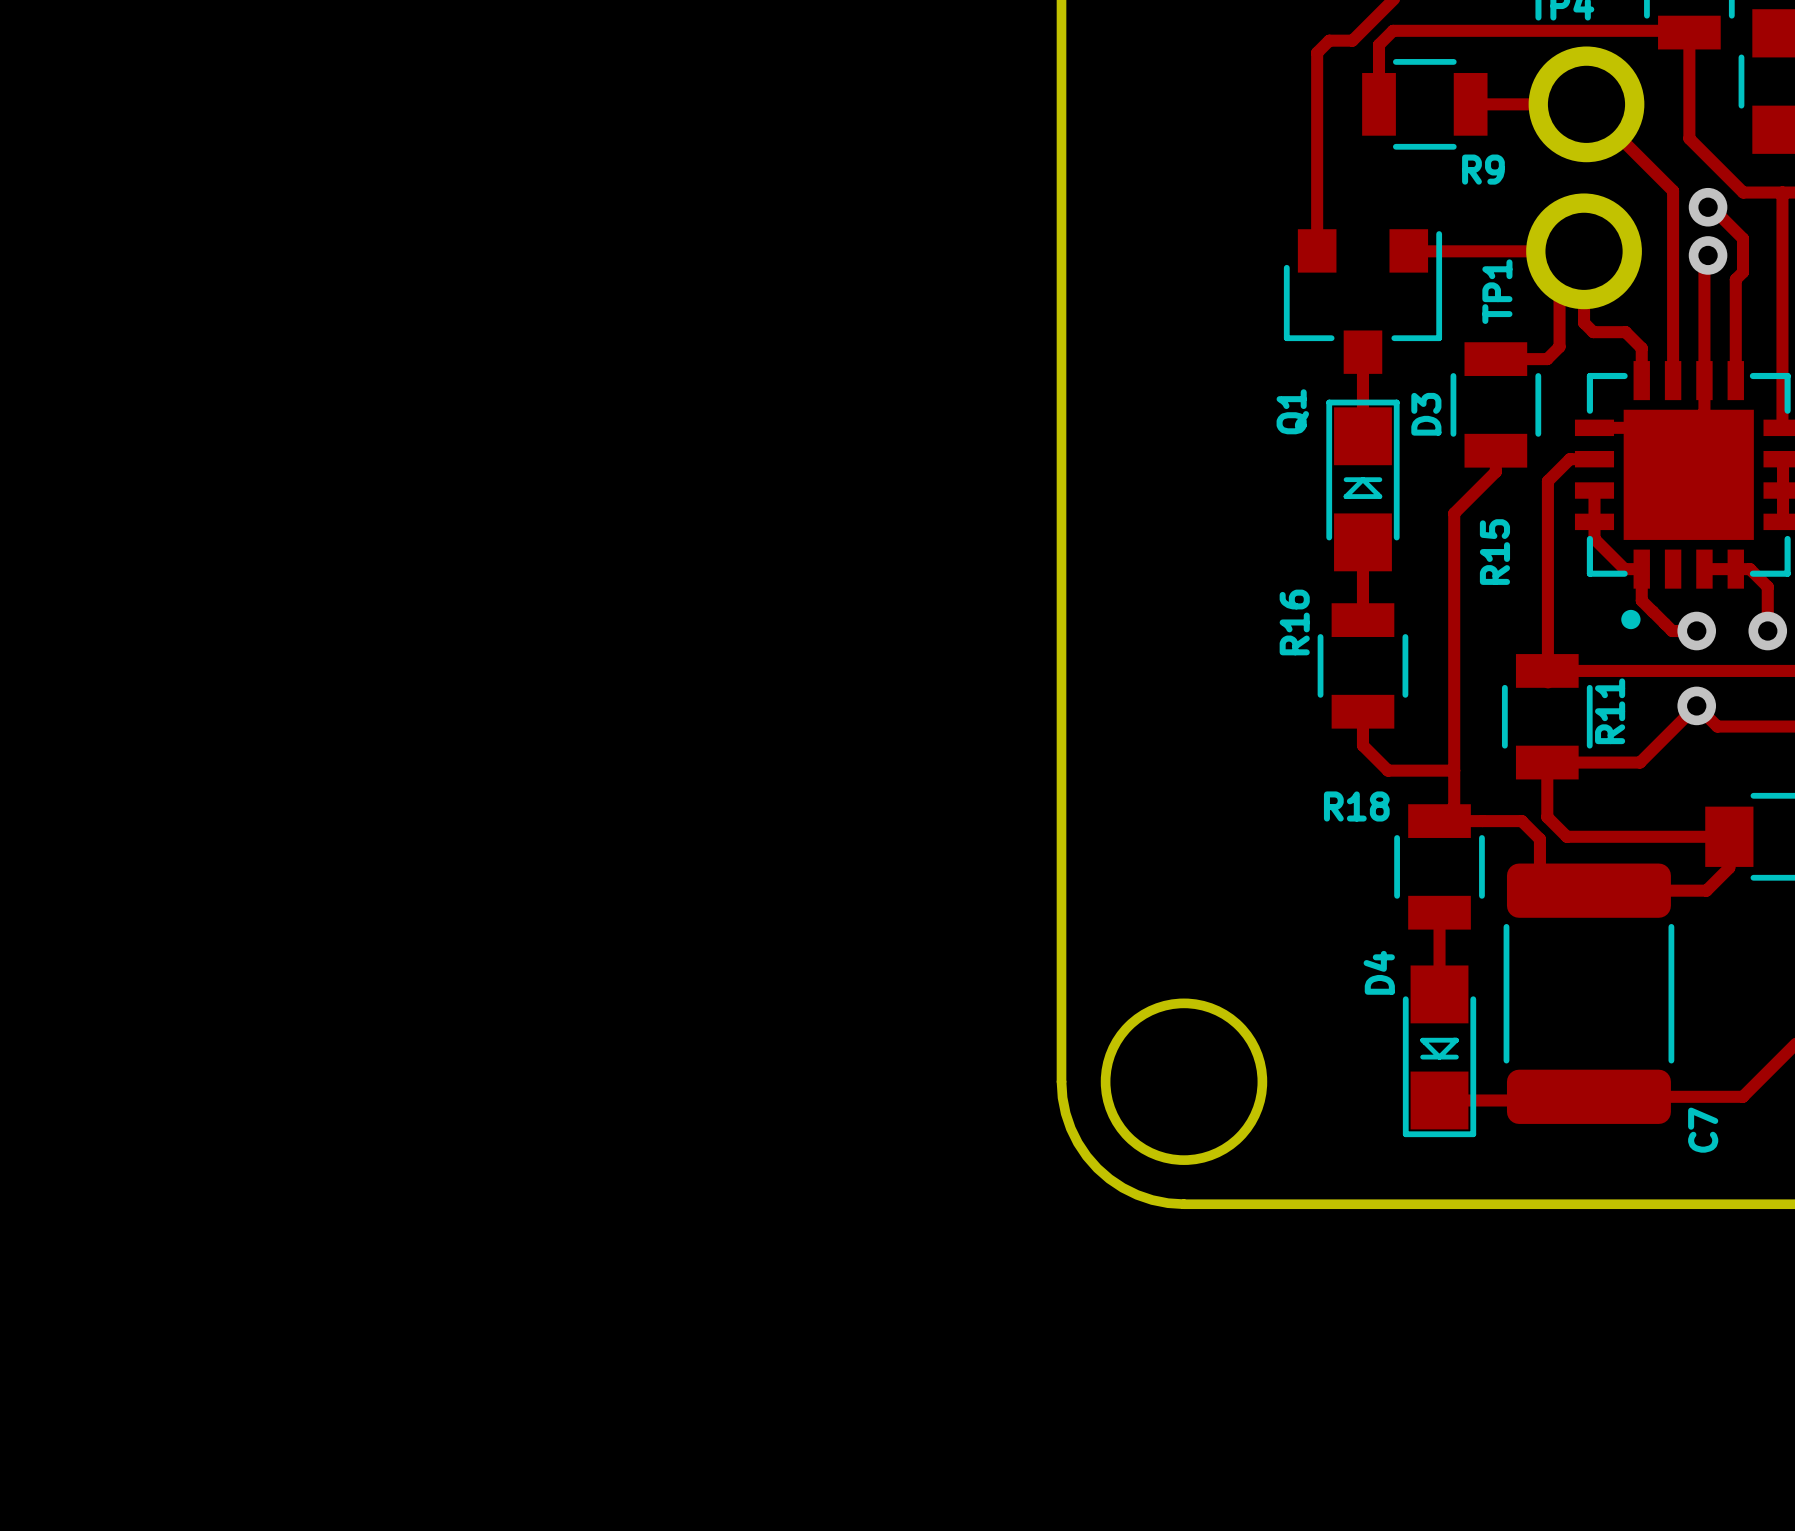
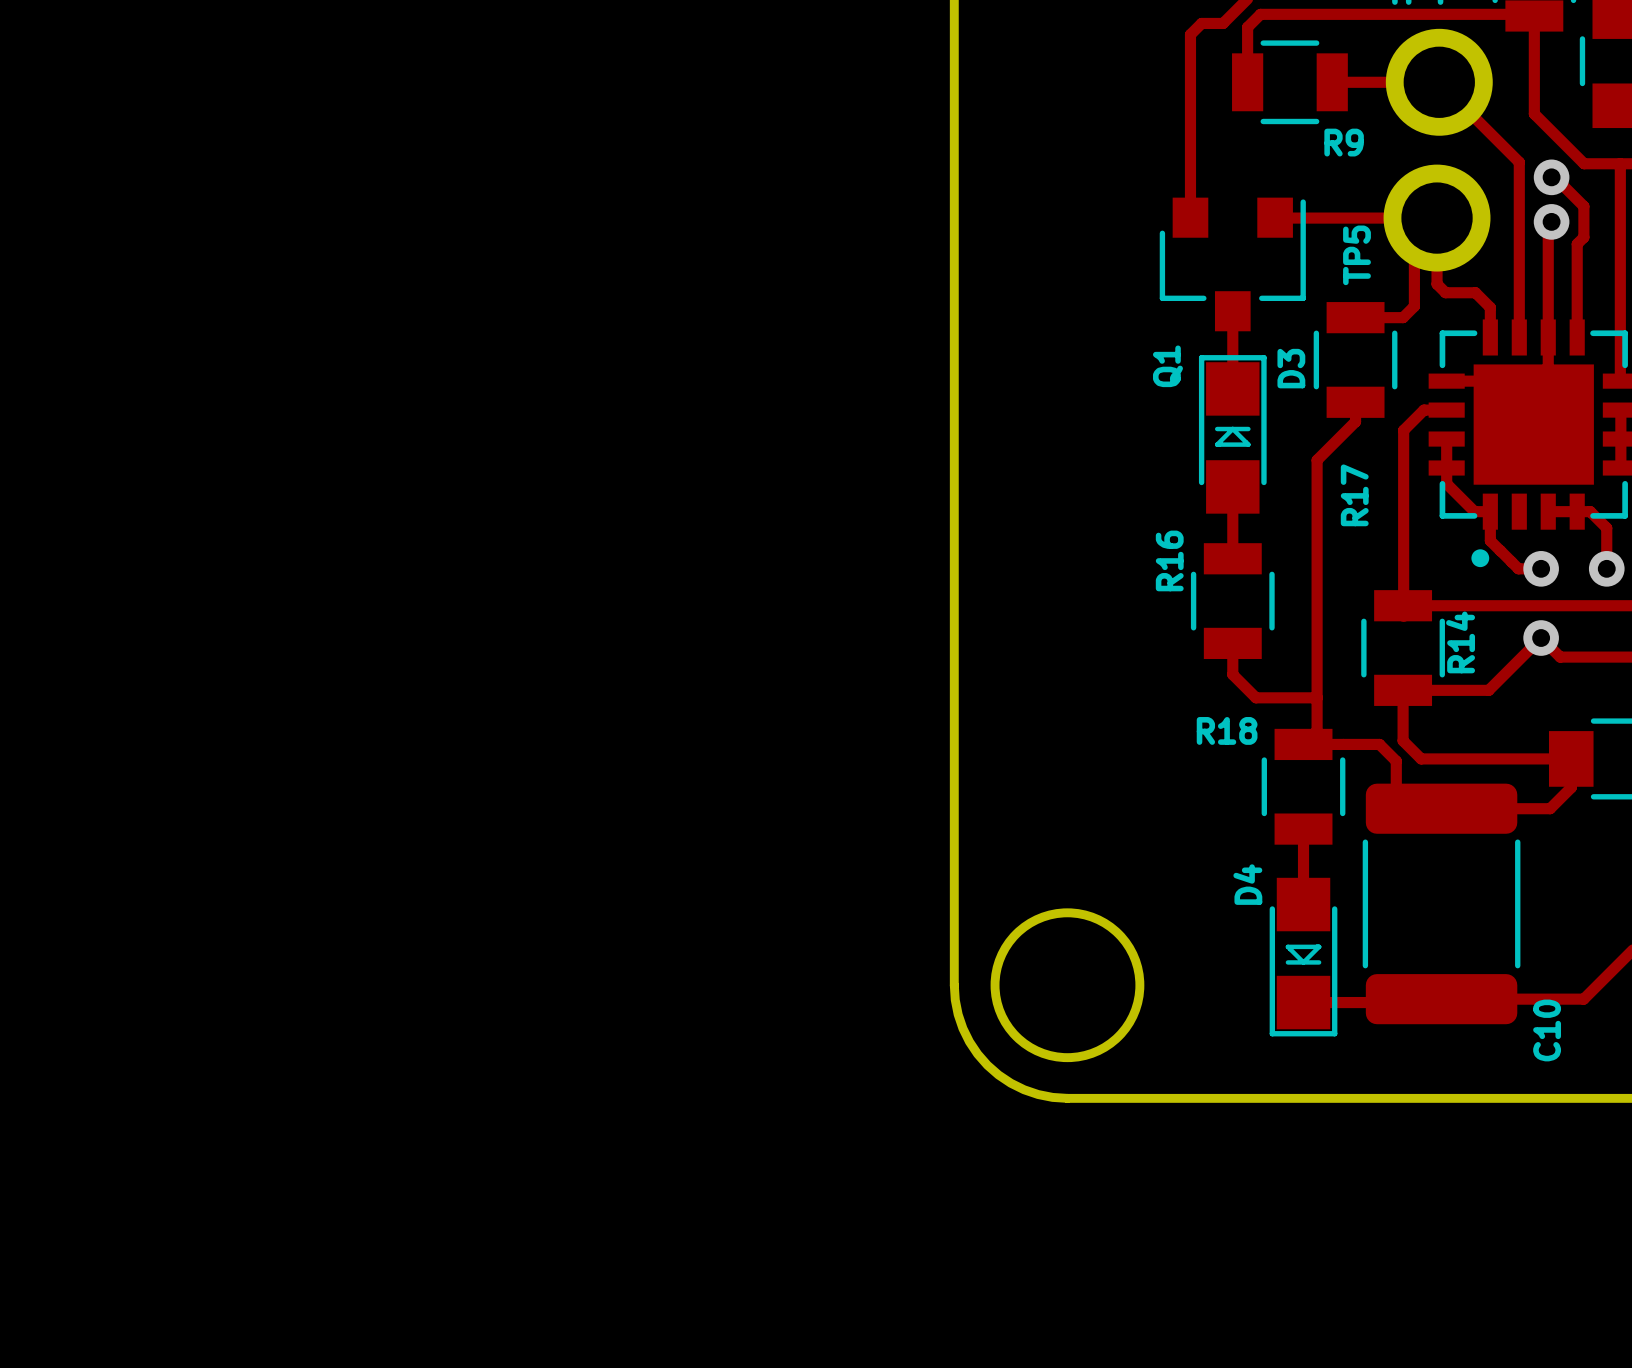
TP1 name: TP1 (1497, 291) -> TP5 (1356, 255)
R15 name: R15 (1494, 552) -> R17 (1354, 495)
R11 name: R11 (1610, 711) -> R14 (1460, 642)
C7 name: C7 (1703, 1130) -> C10 (1547, 1030)

